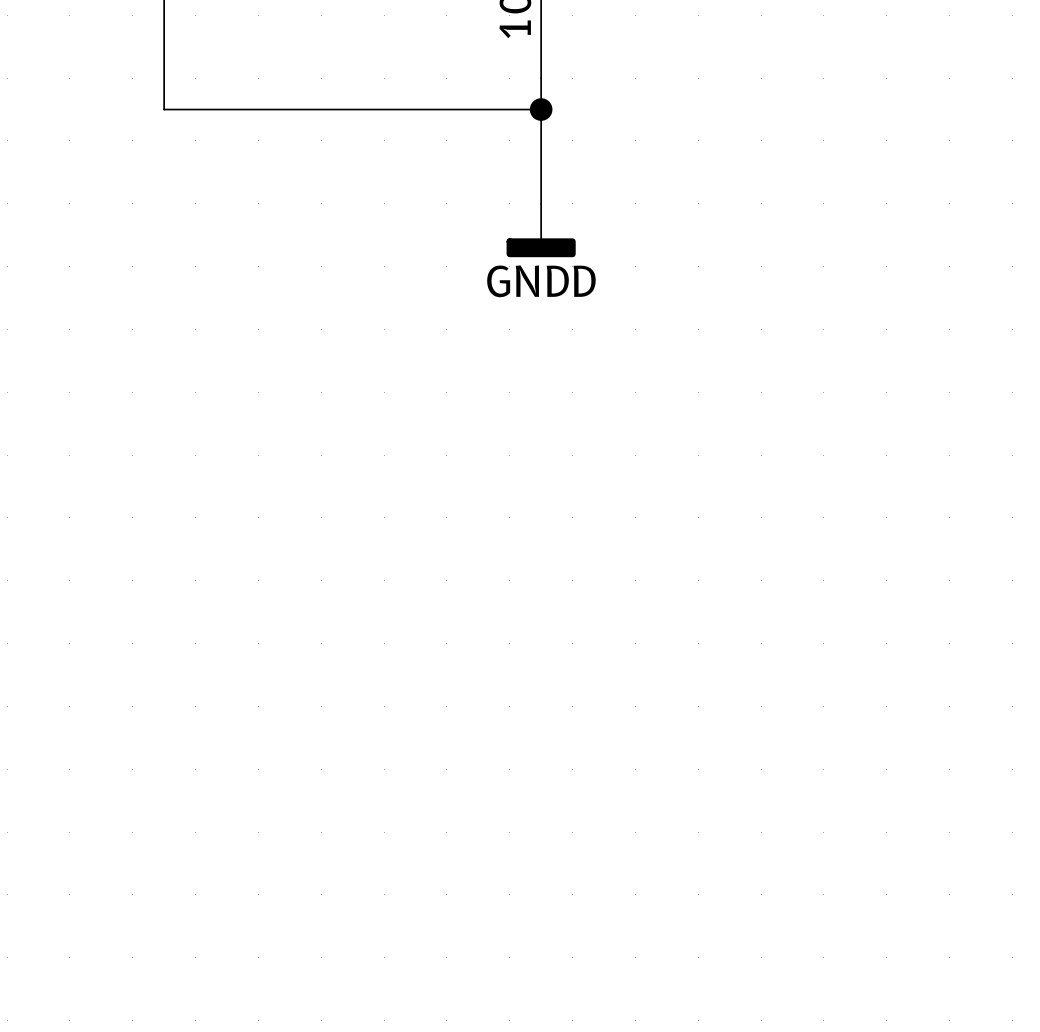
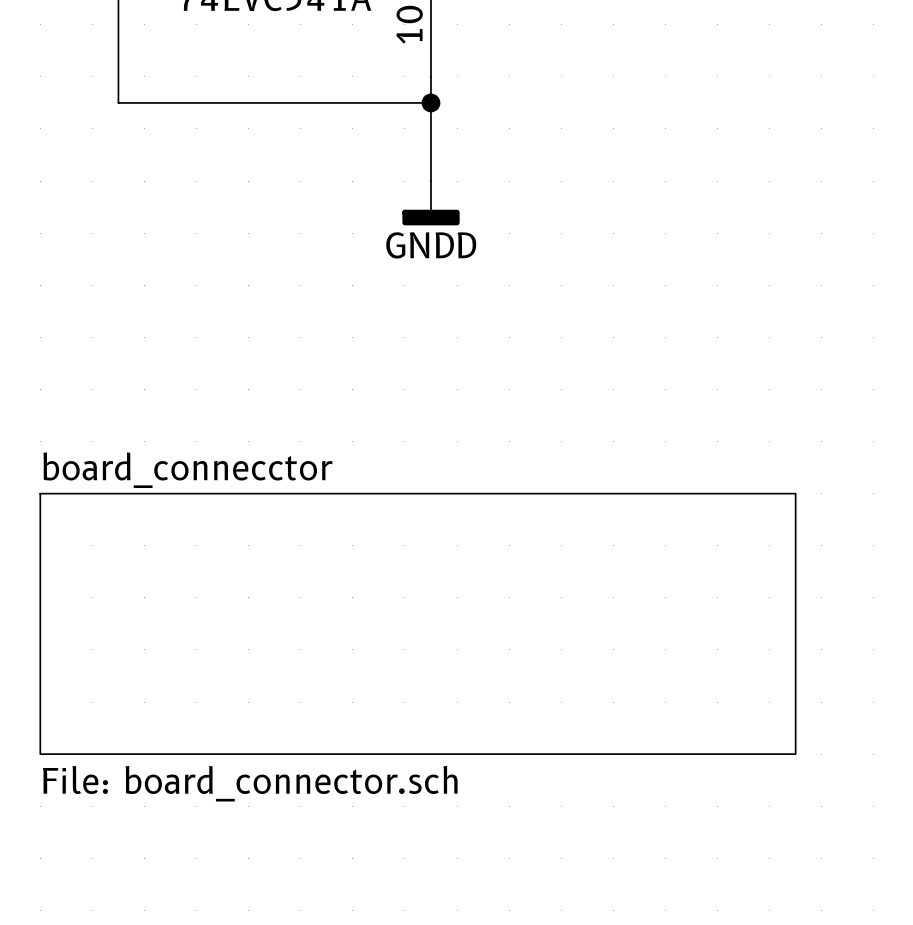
sheet board_connecctor: none -> File: board_connector.sch (417, 623)

